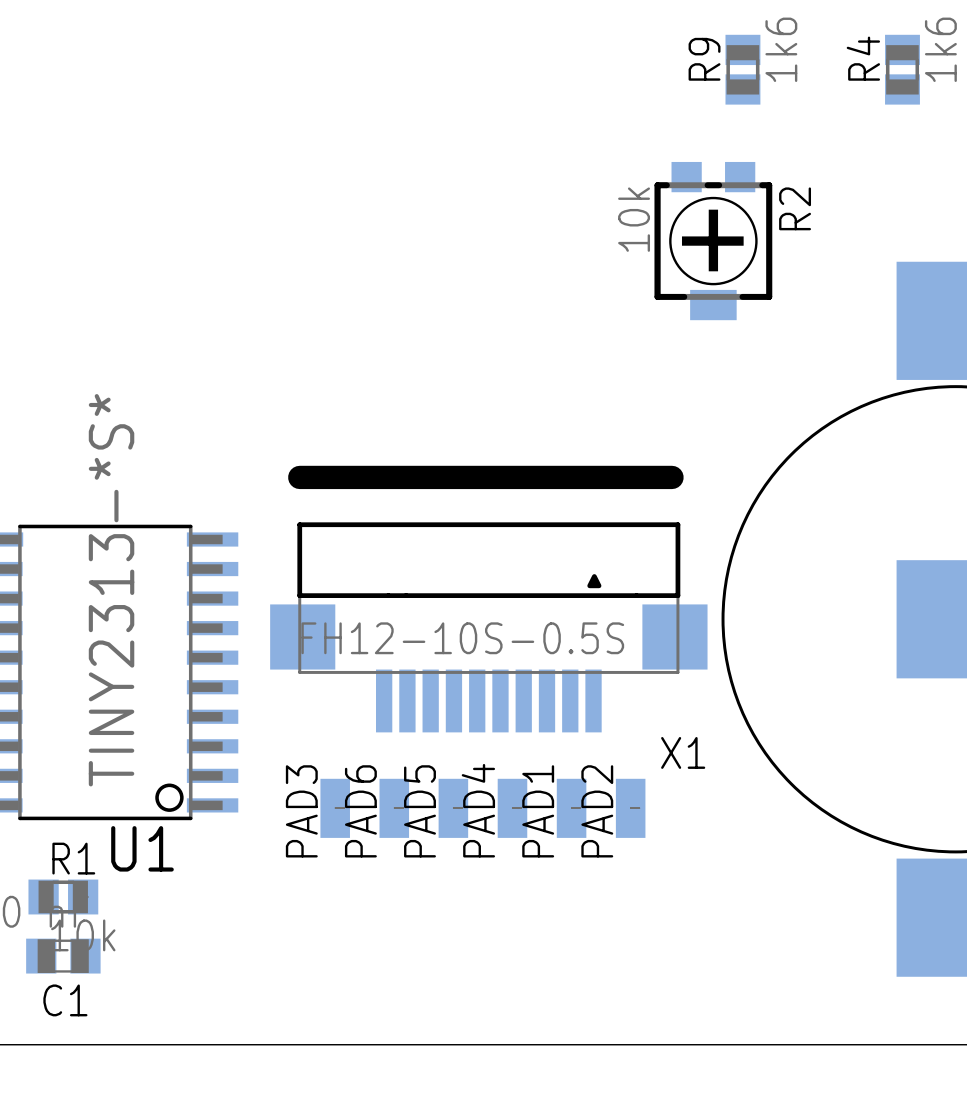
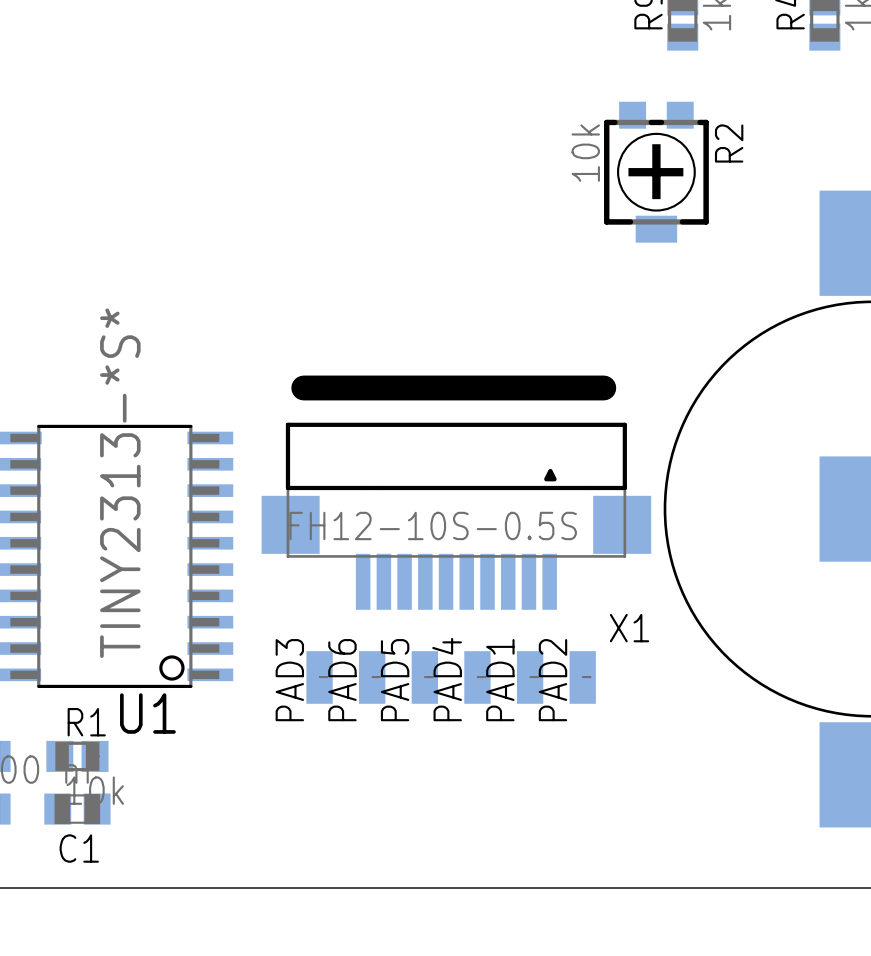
board edge: (672, 477) (299, 477) -> none
board edge: none -> (603, 387) (303, 387)

